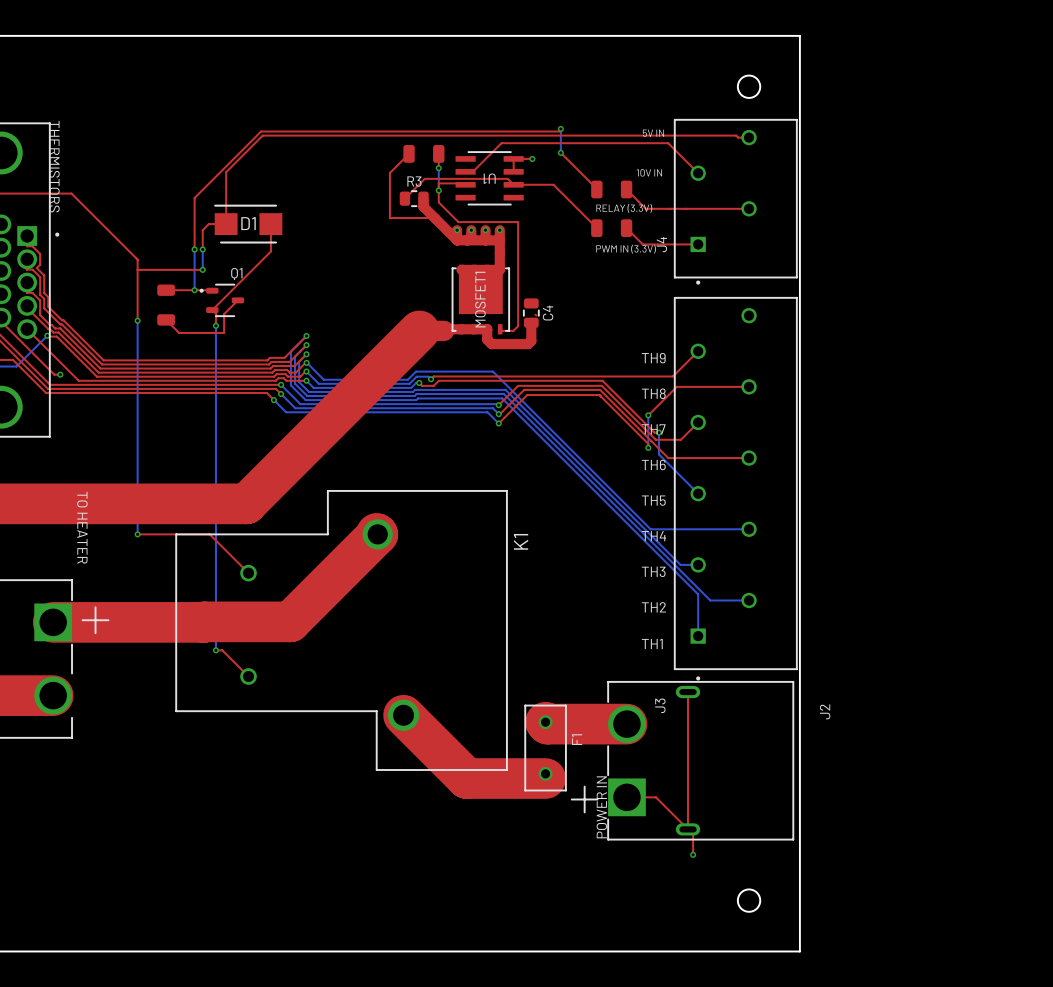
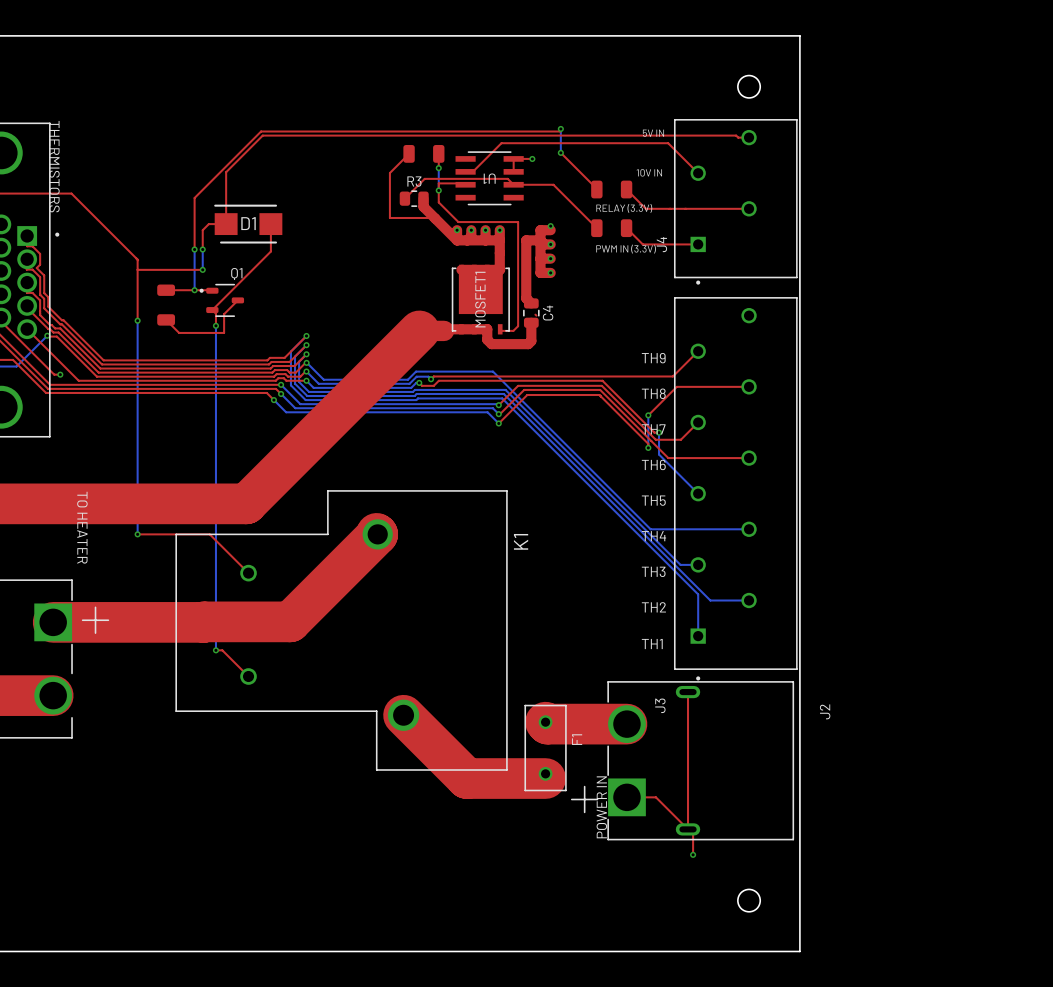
via: none -> (550, 226)
top track: none -> (550, 230) (540, 230) (540, 272) (550, 272)
top track: none -> (550, 244) (544, 244) (540, 240) (526, 240) (526, 298) (531, 303)
via: none -> (550, 244)
top track: none -> (540, 258) (550, 258)
via: none -> (550, 258)
via: none -> (550, 272)

